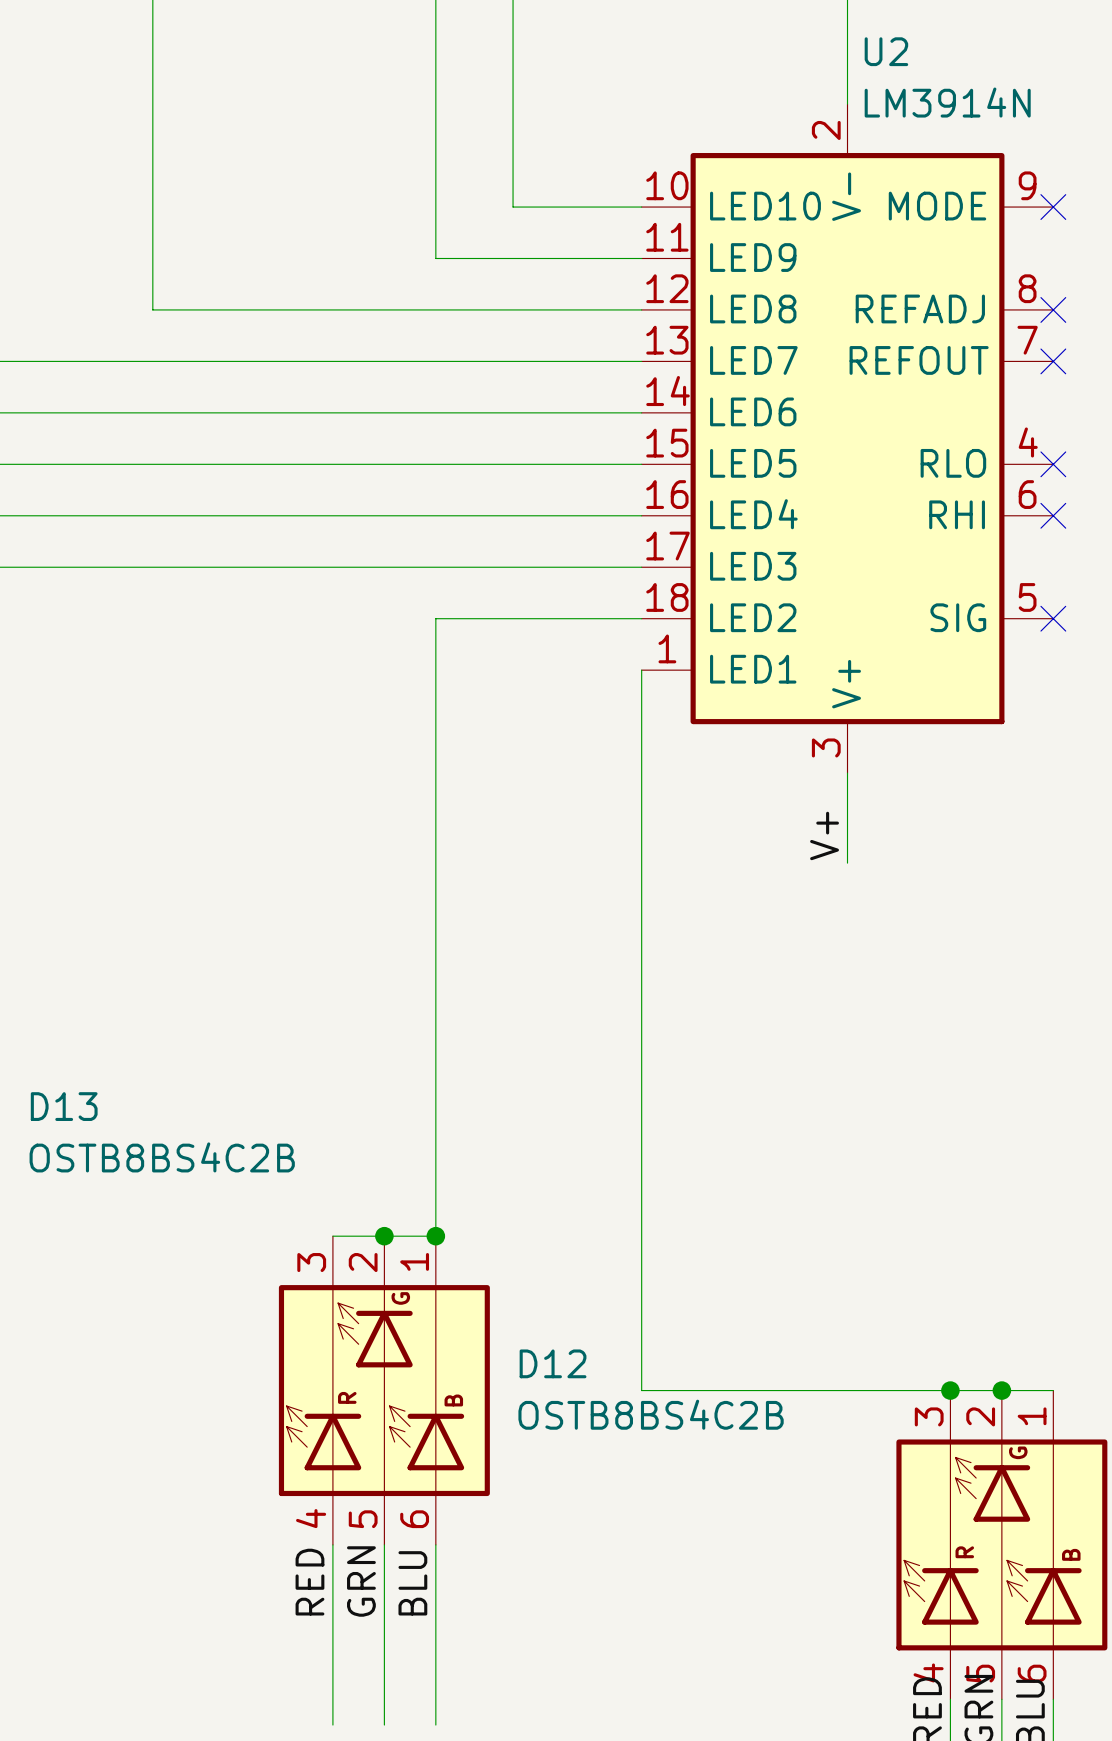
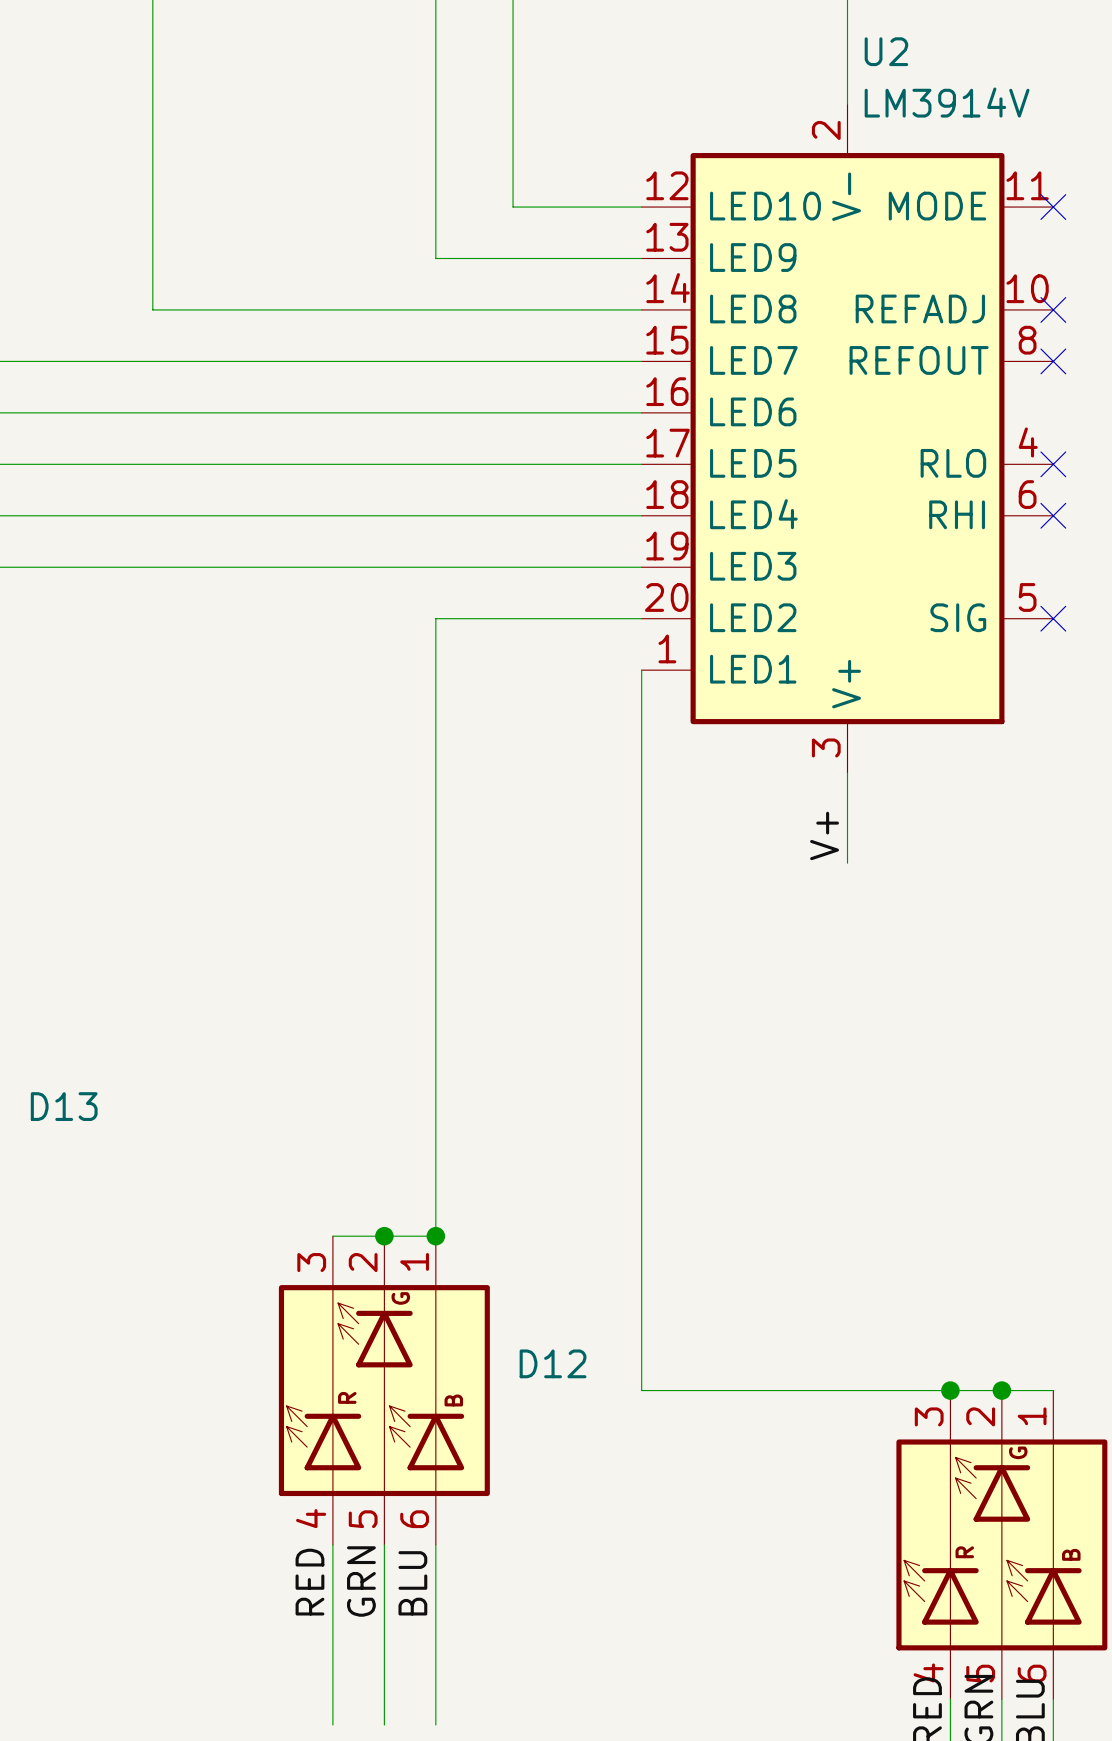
U2 value: LM3914N (947, 102) -> LM3914V (947, 102)
U2 symbol: [641, 104, 1054, 774] -> [641, 104, 1054, 774]
D13 value: OSTB8BS4C2B (162, 1157) -> none
D12 value: OSTB8BS4C2B (651, 1414) -> none

